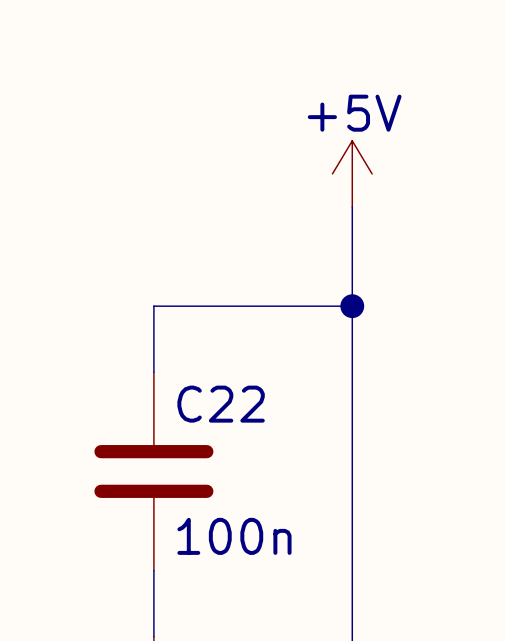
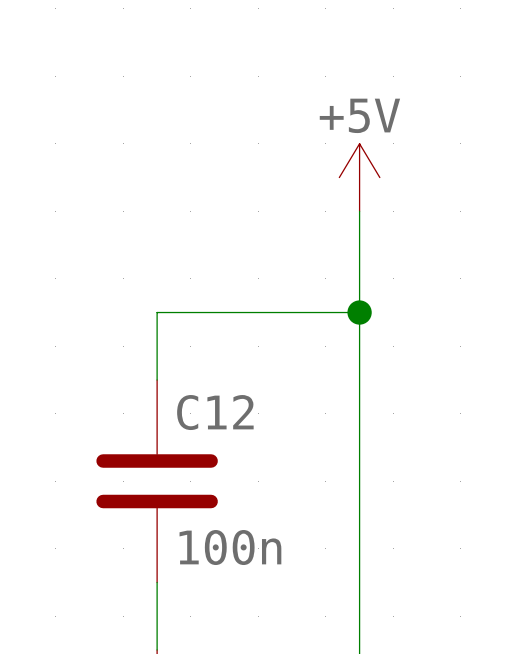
C22 name: C22 (221, 404) -> C12 (215, 412)

